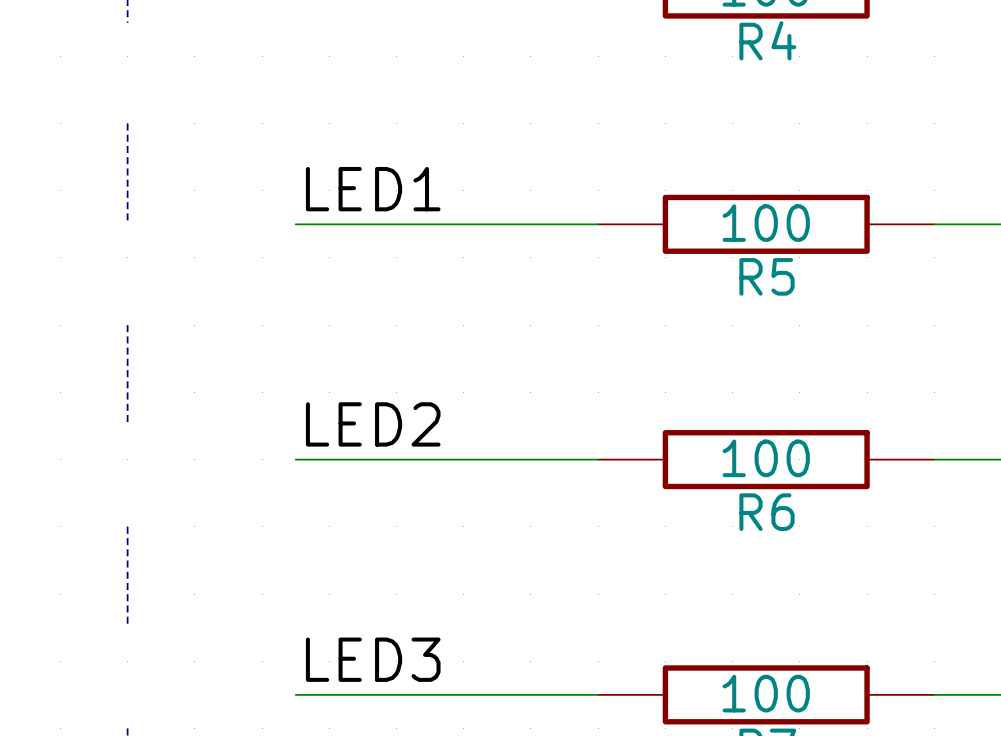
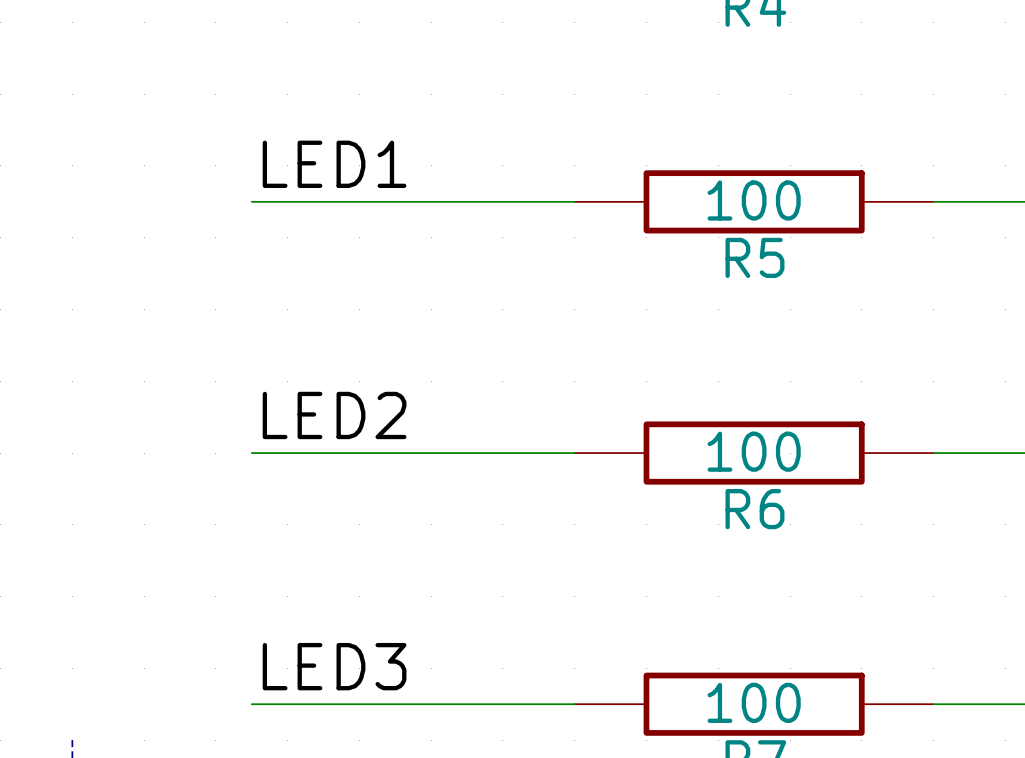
line: (127, 123) (127, 224) -> none
line: (127, 325) (127, 426) -> none
line: (127, 526) (127, 627) -> none

